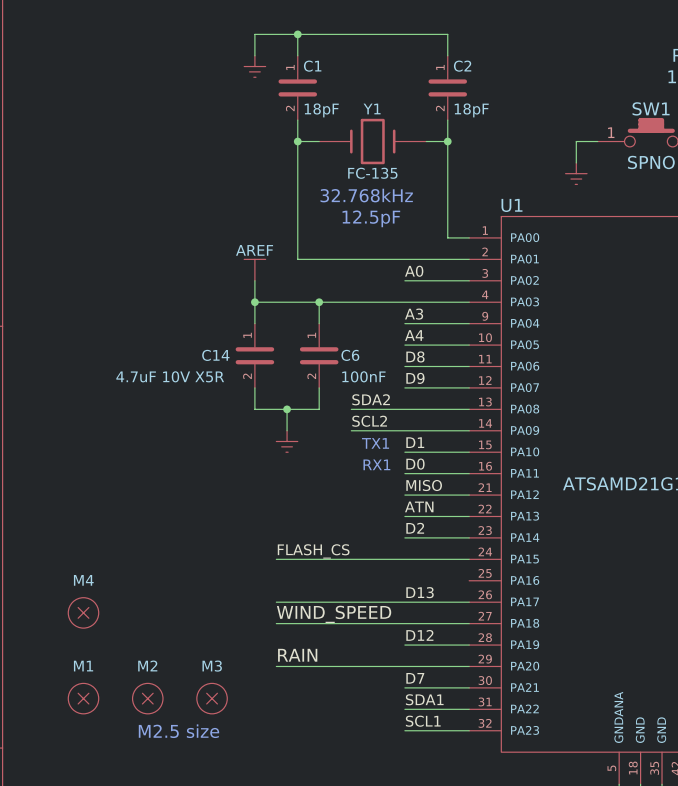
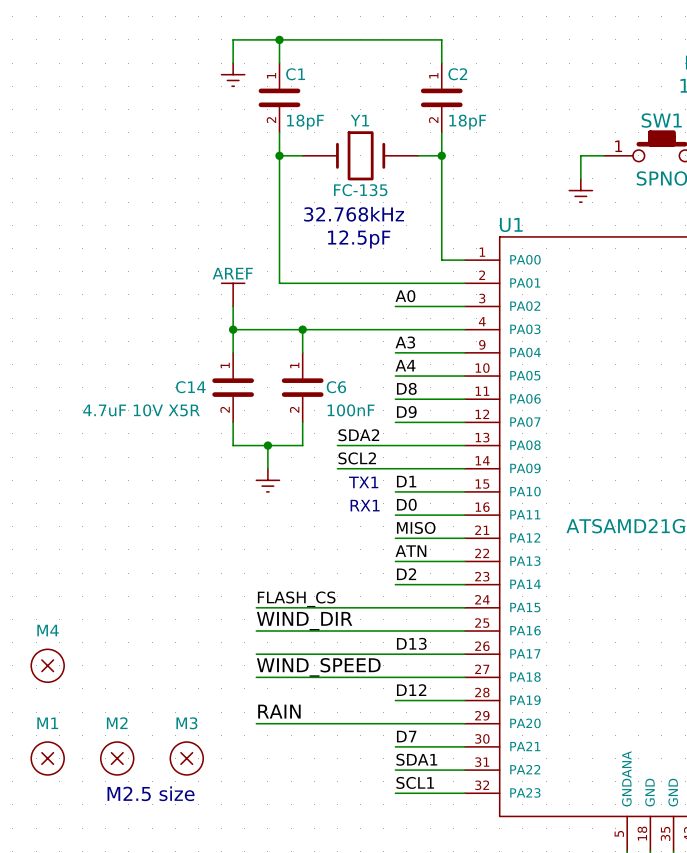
label: none -> WIND_DIR (304, 621)
wire: none -> (256, 631) (464, 631)

